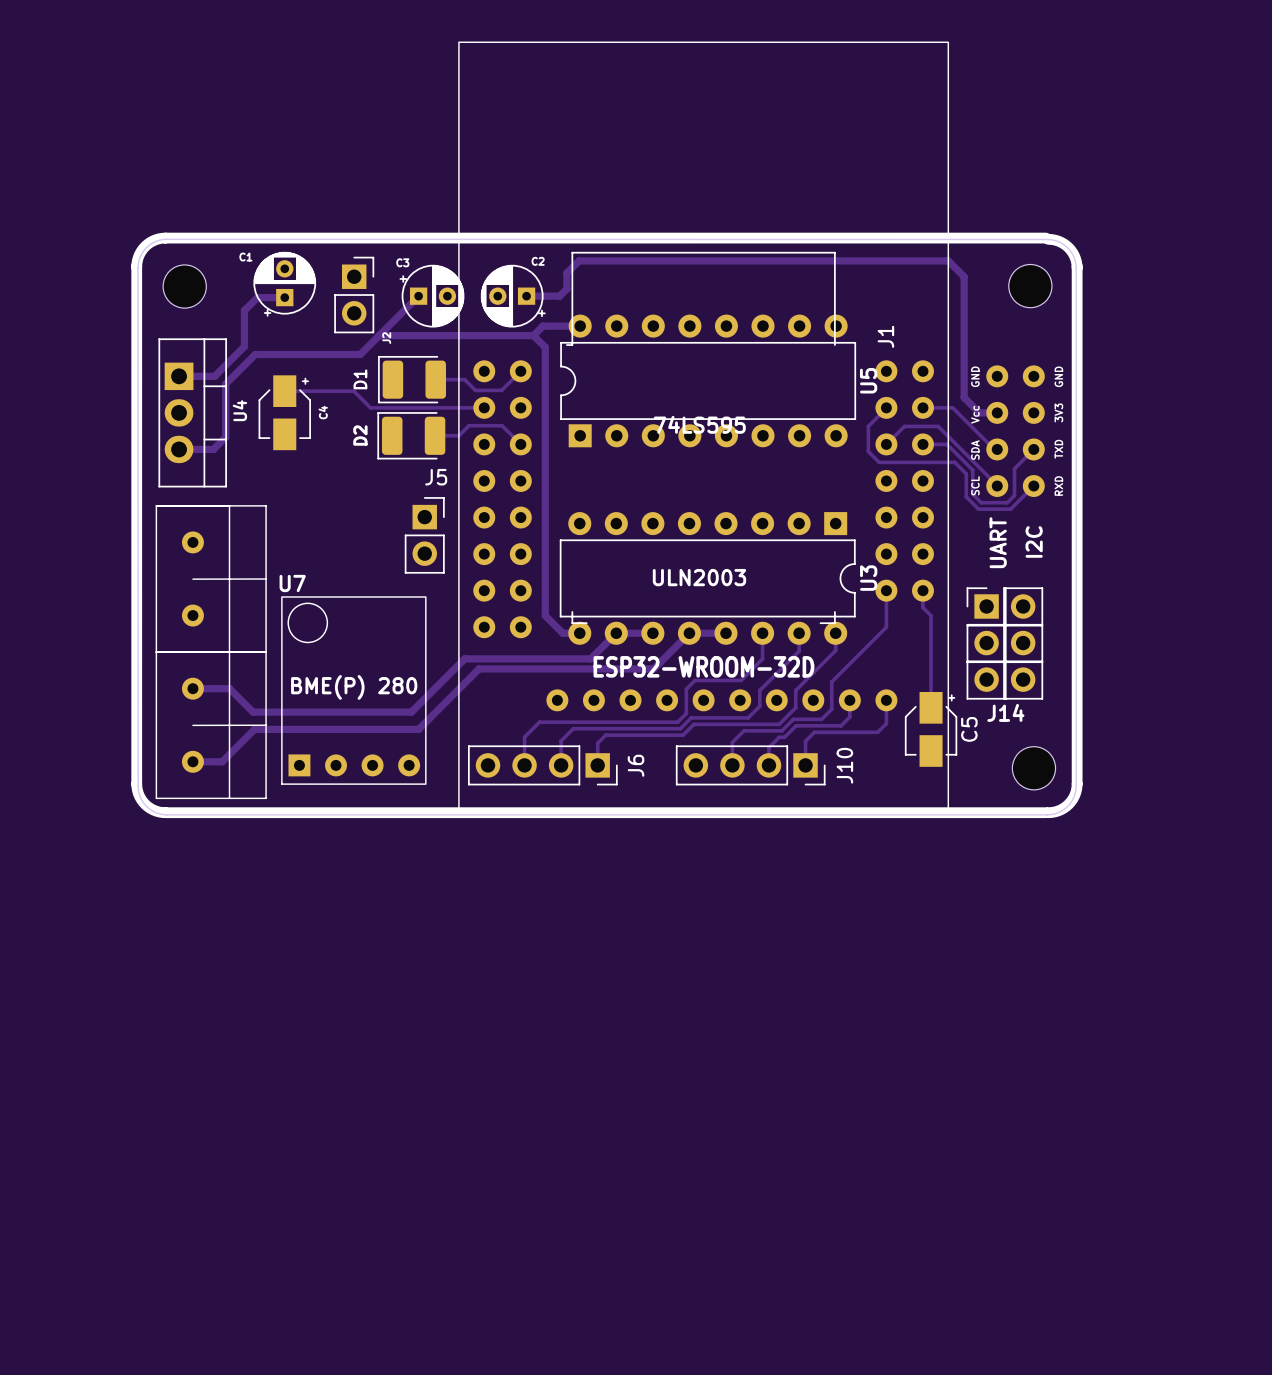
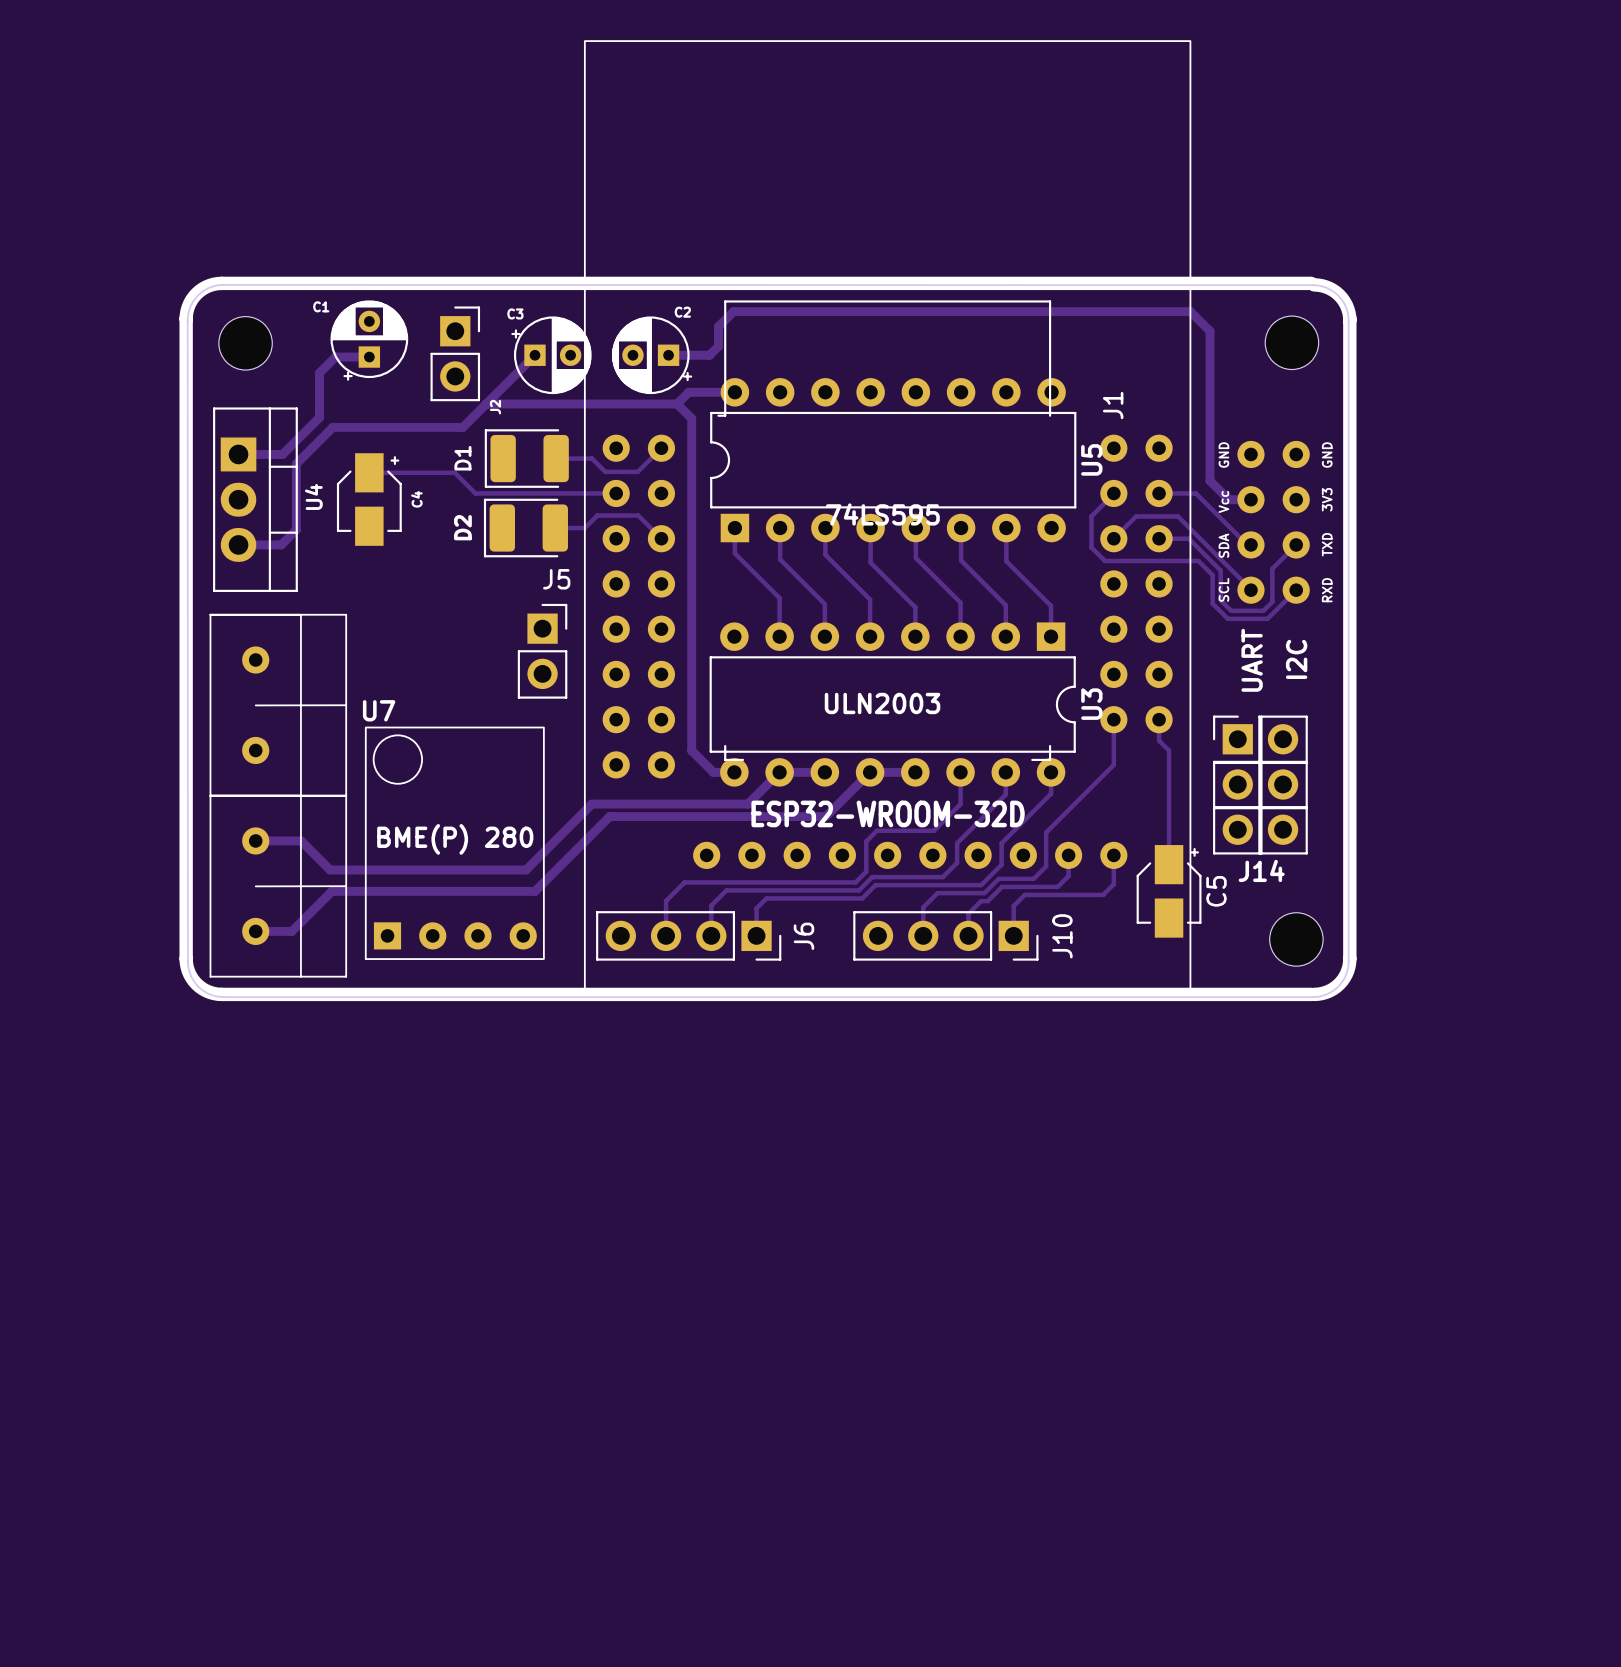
track: none -> (734, 528) (734, 553) (779, 598) (779, 636)
track: none -> (780, 528) (780, 559) (824, 604) (824, 636)
track: none -> (825, 528) (825, 554) (870, 599) (870, 636)
track: none -> (870, 528) (870, 562) (915, 607) (915, 636)
track: none -> (915, 528) (915, 558) (960, 602) (960, 636)
track: none -> (961, 528) (961, 560) (1005, 605) (1005, 636)
track: none -> (1006, 528) (1006, 561) (1051, 605) (1051, 636)

